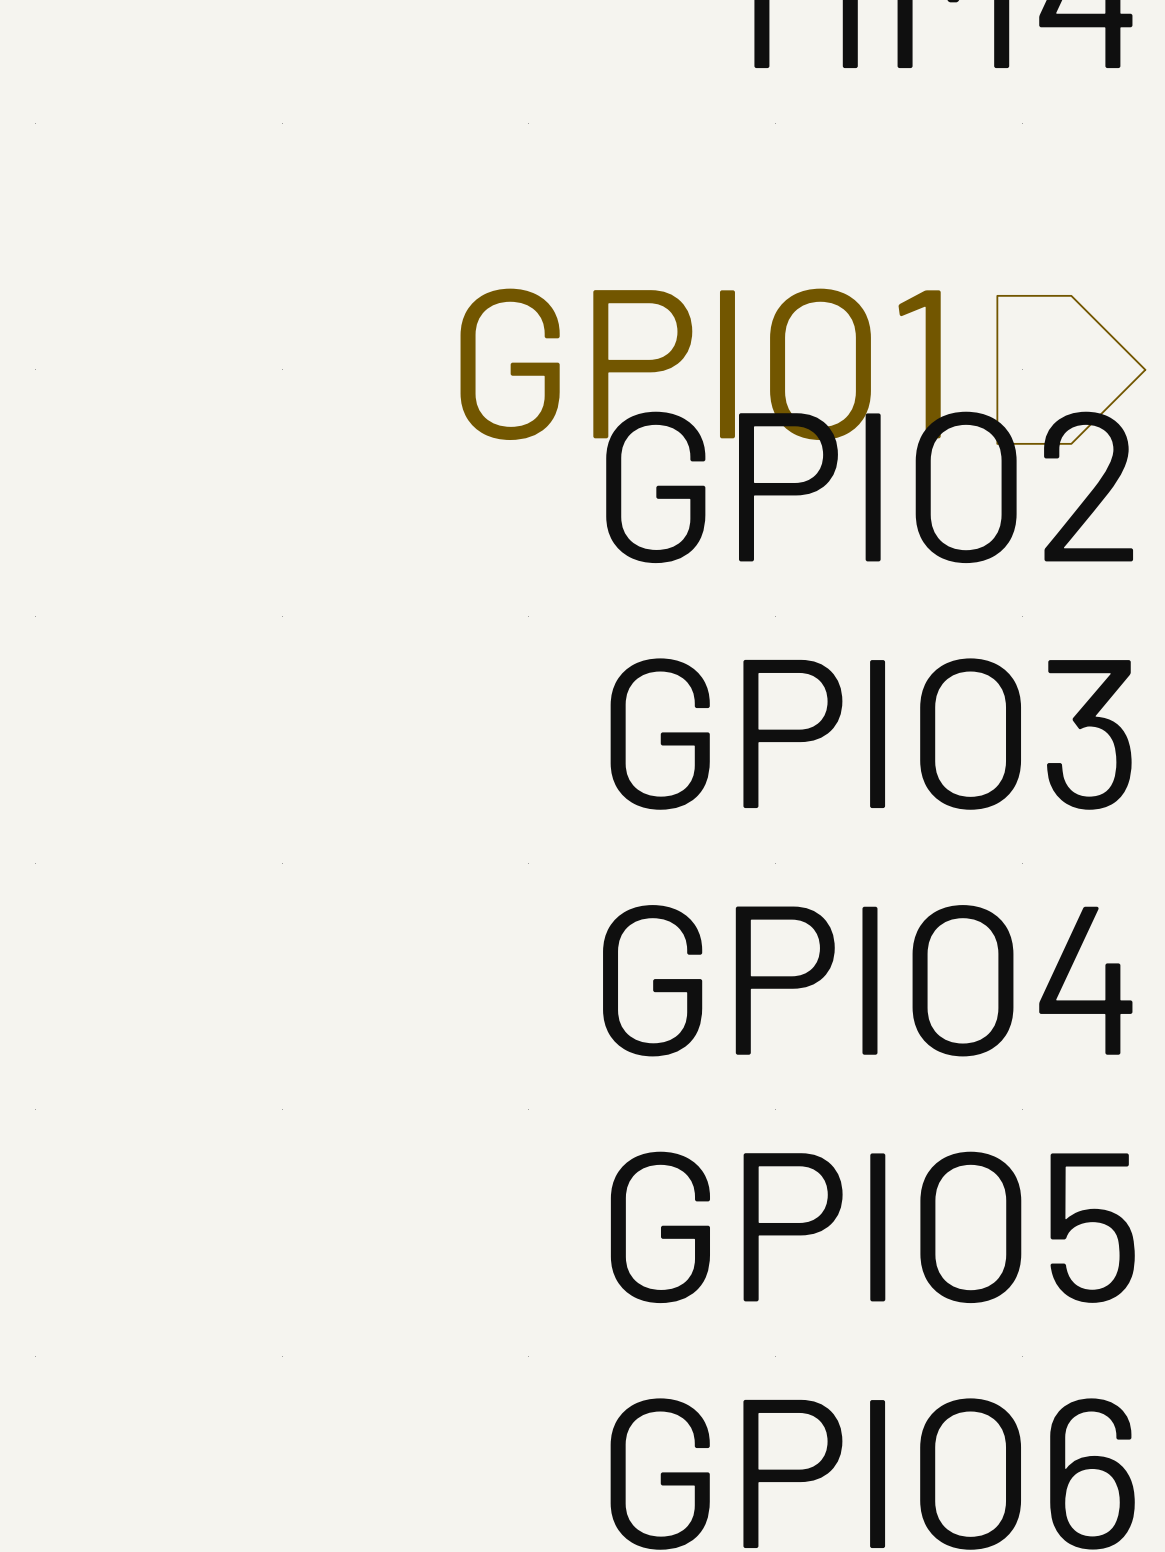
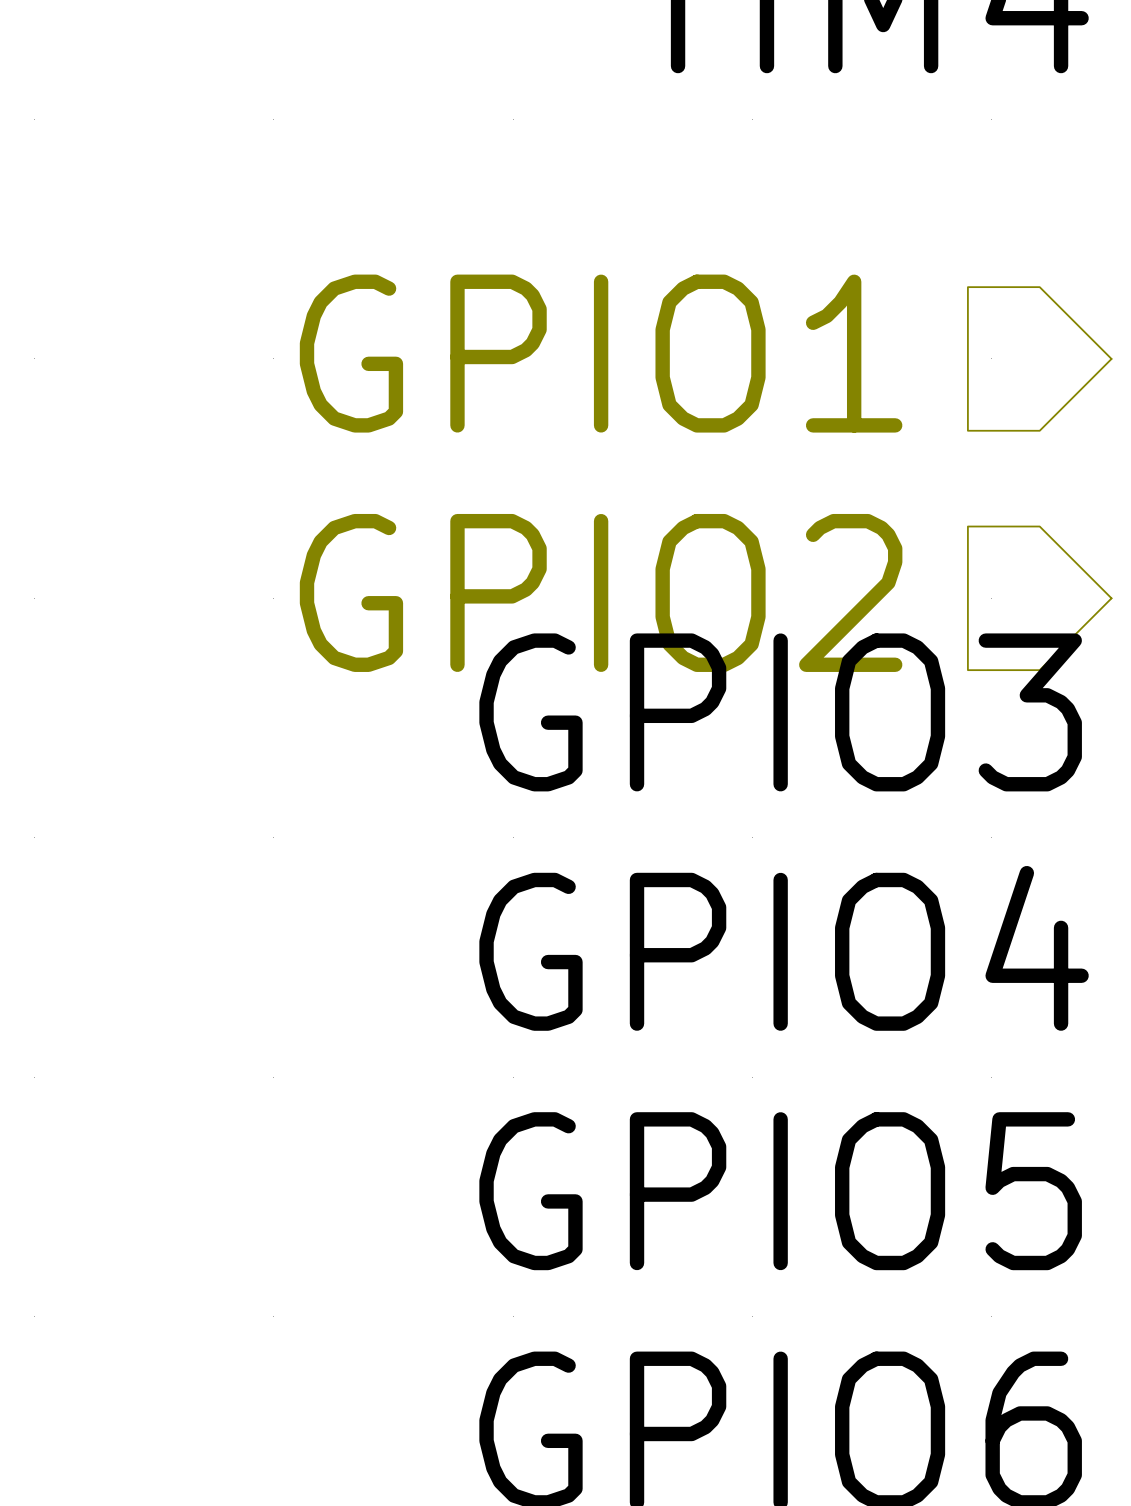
label: GPIO2 (869, 487) -> none
hierarchical label: none -> GPIO2 (601, 592)

